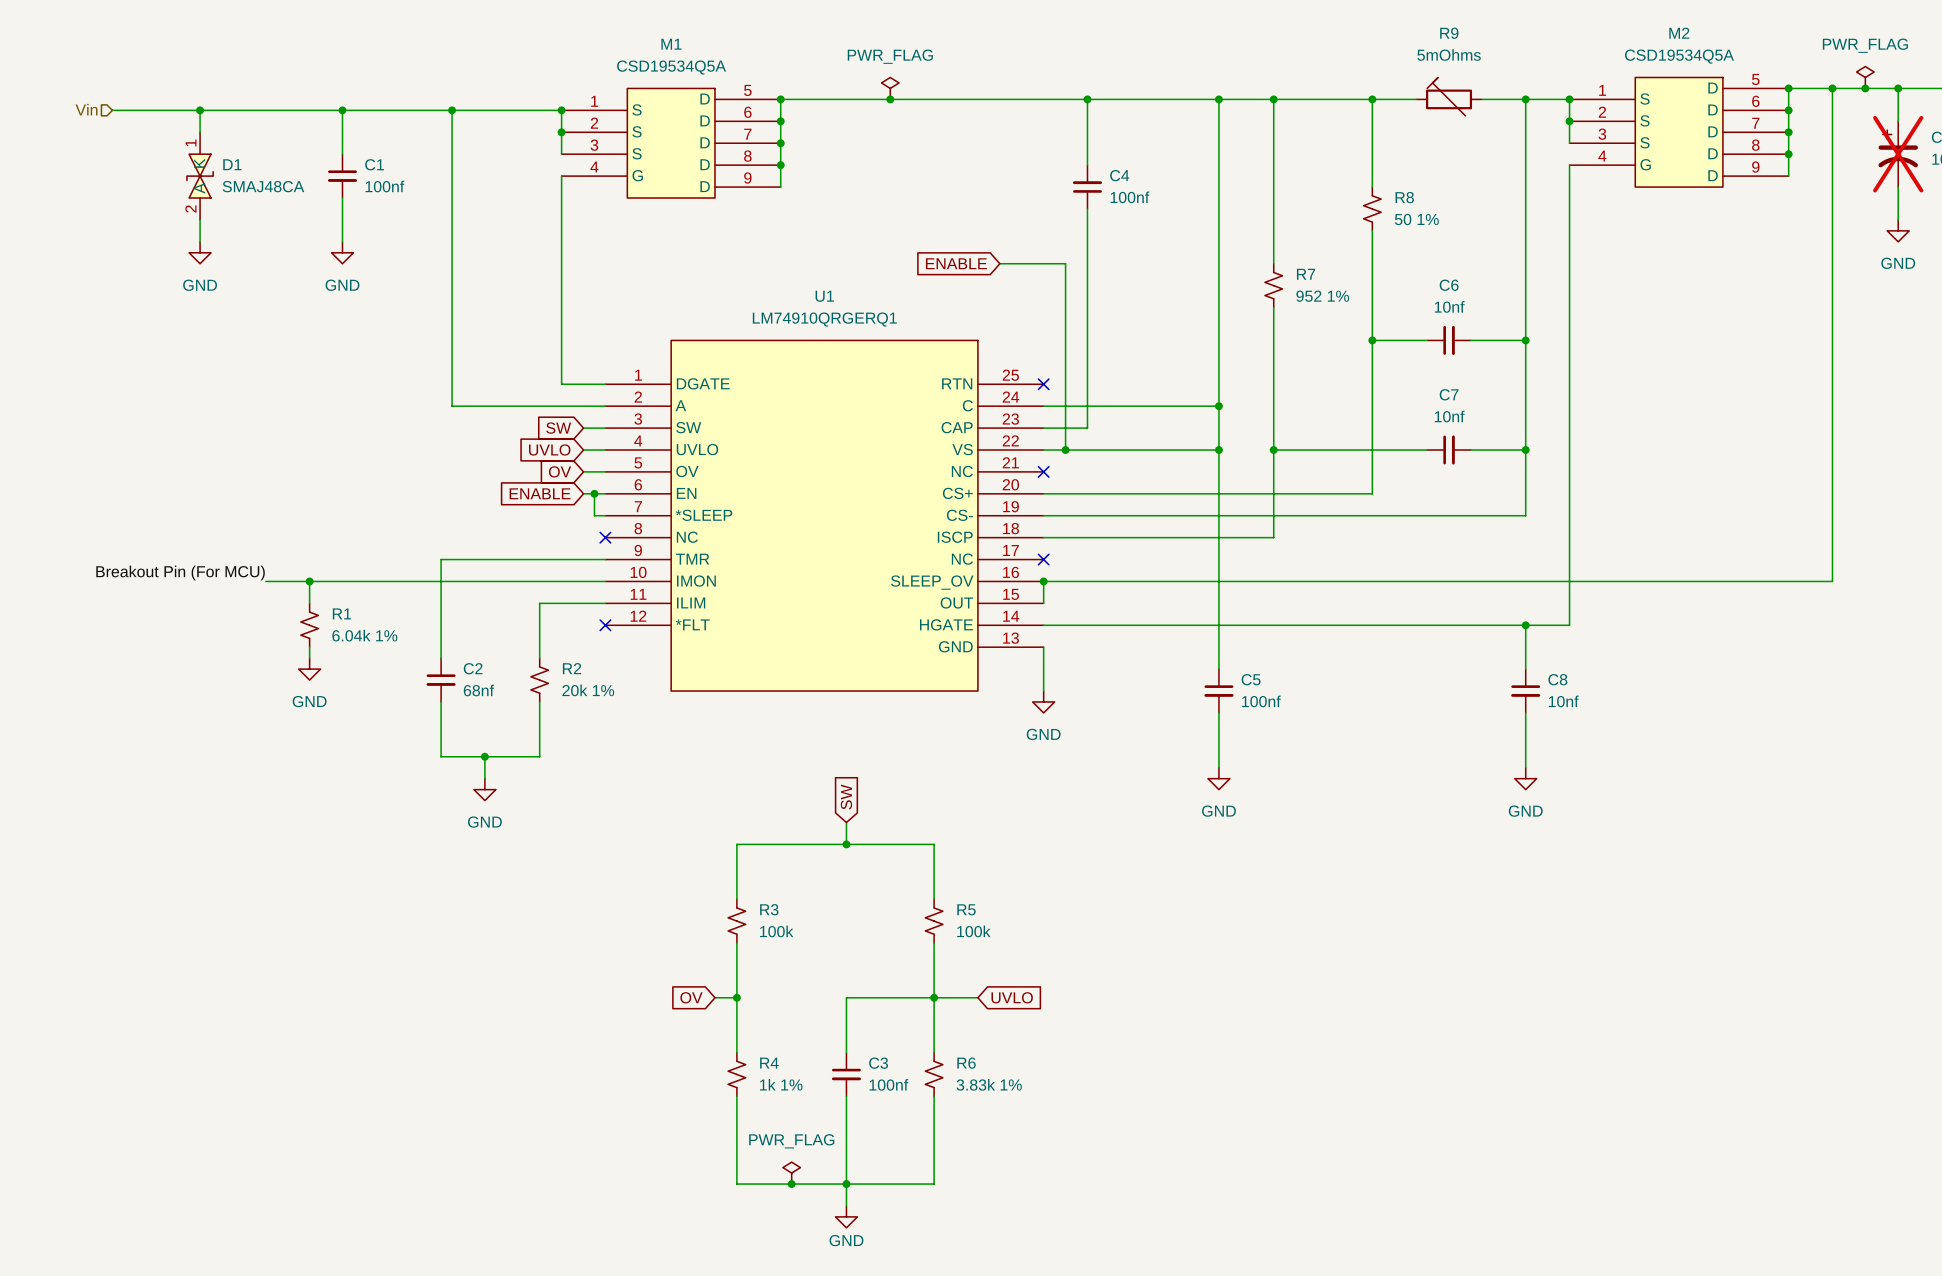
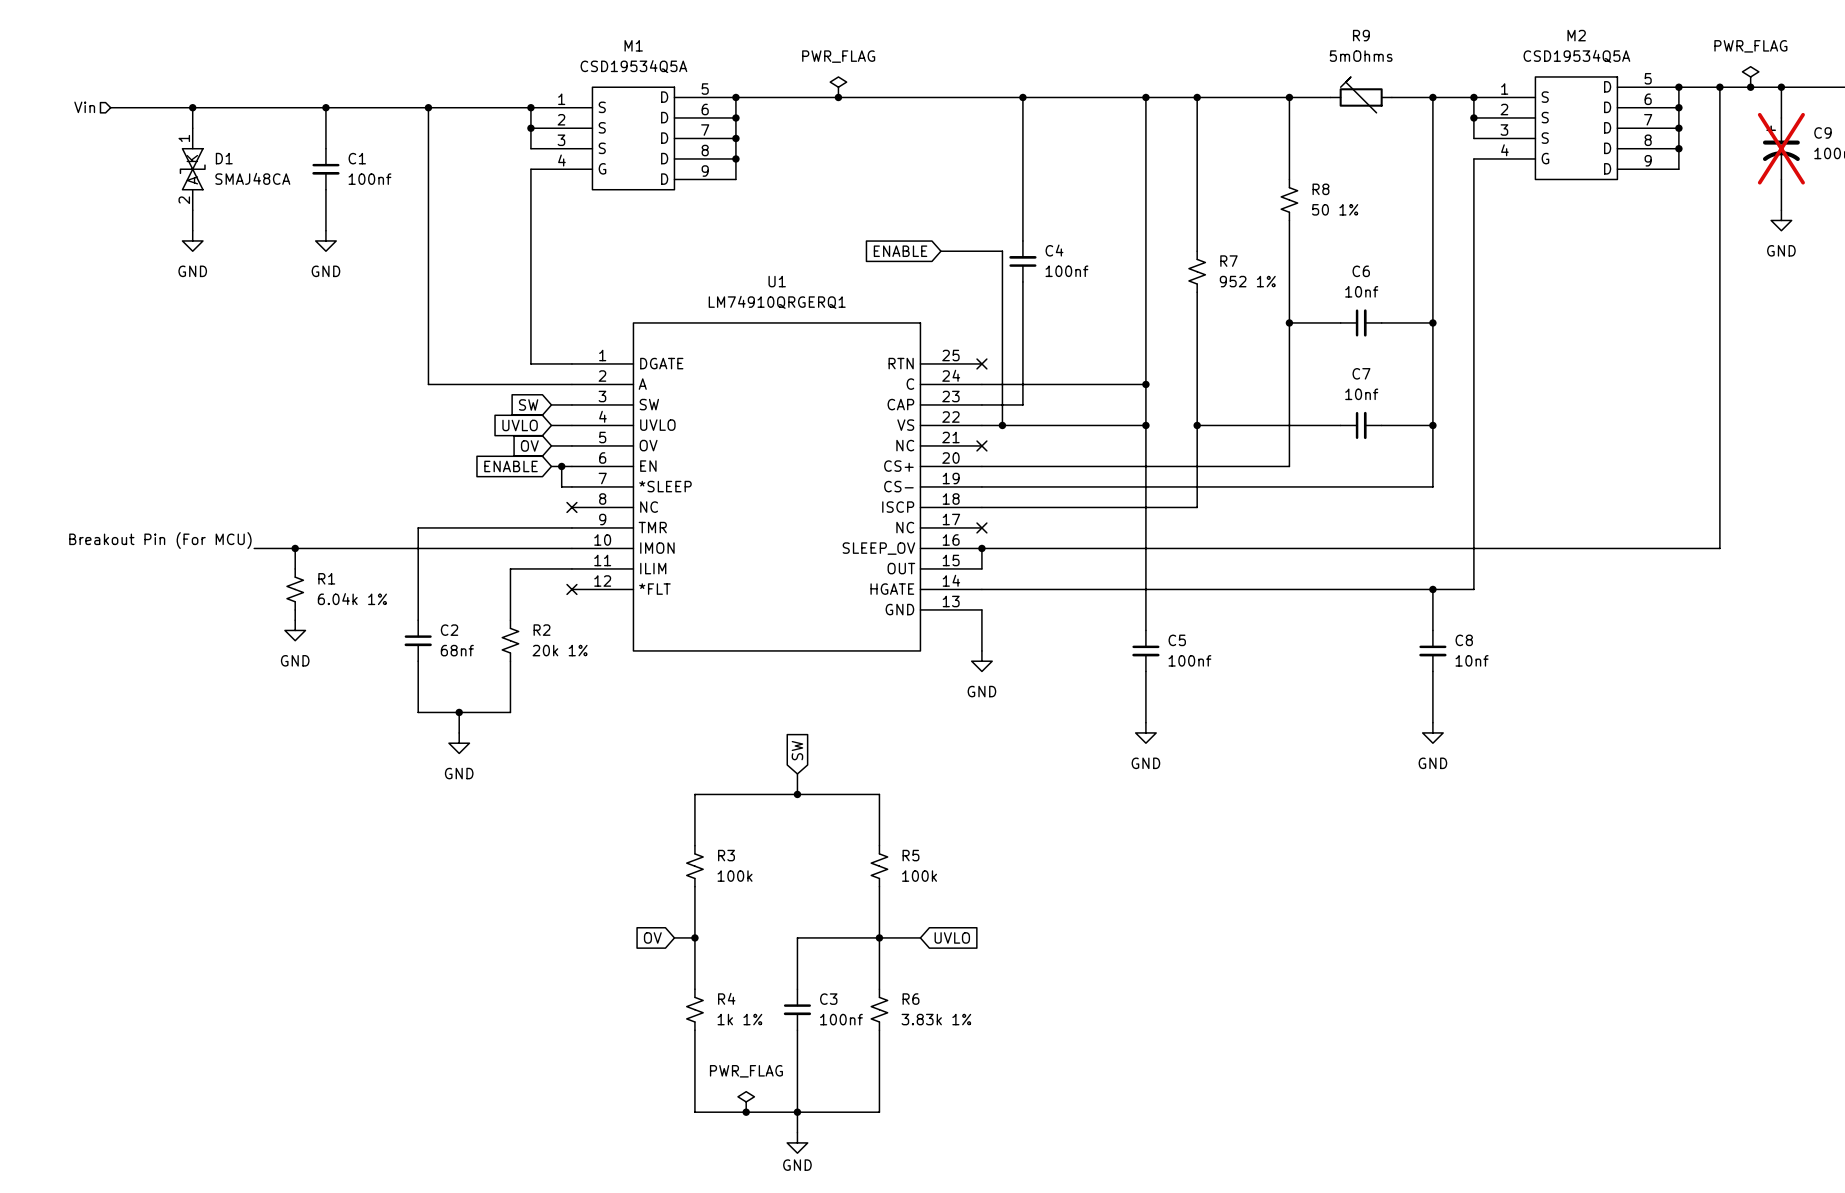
C4 position: (1087, 187) -> (1022, 261)

